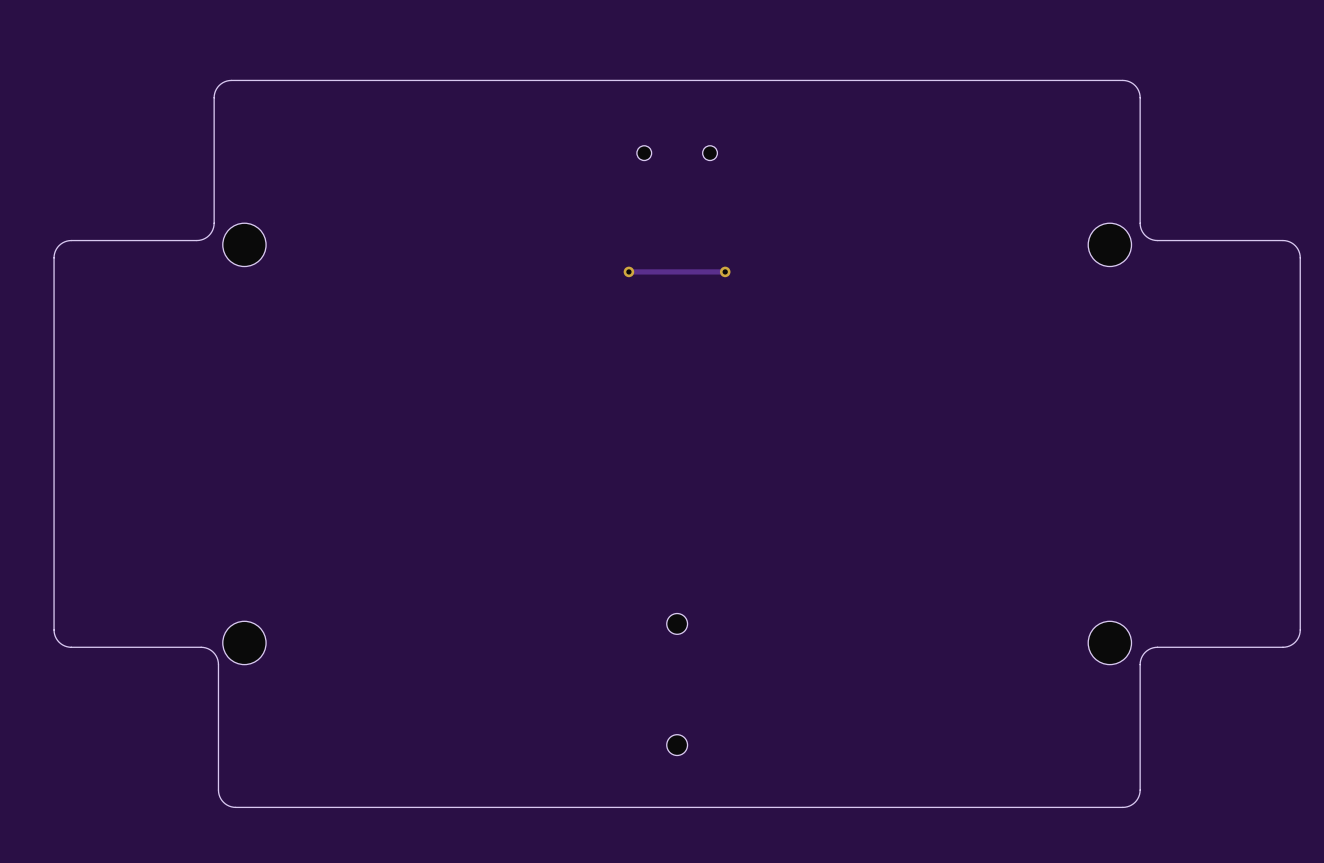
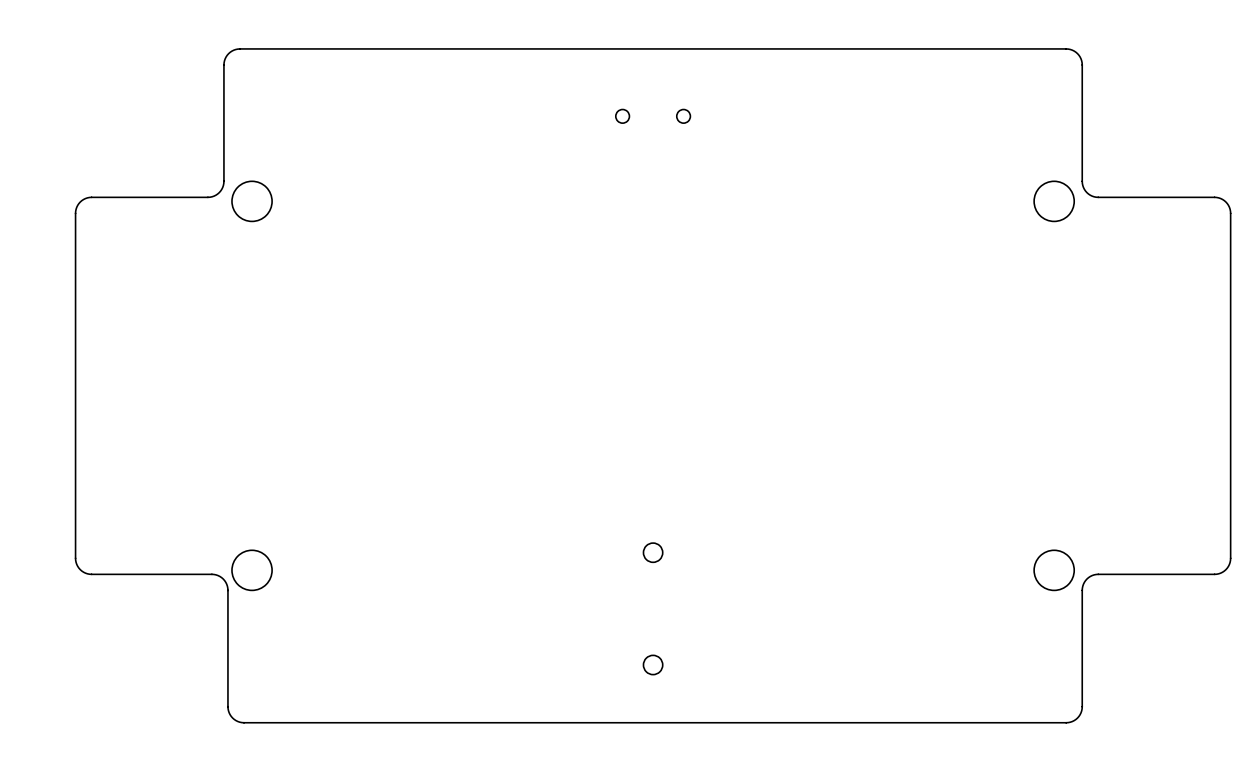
via: (628, 271) -> none
track: (725, 271) (628, 271) -> none
via: (725, 271) -> none

